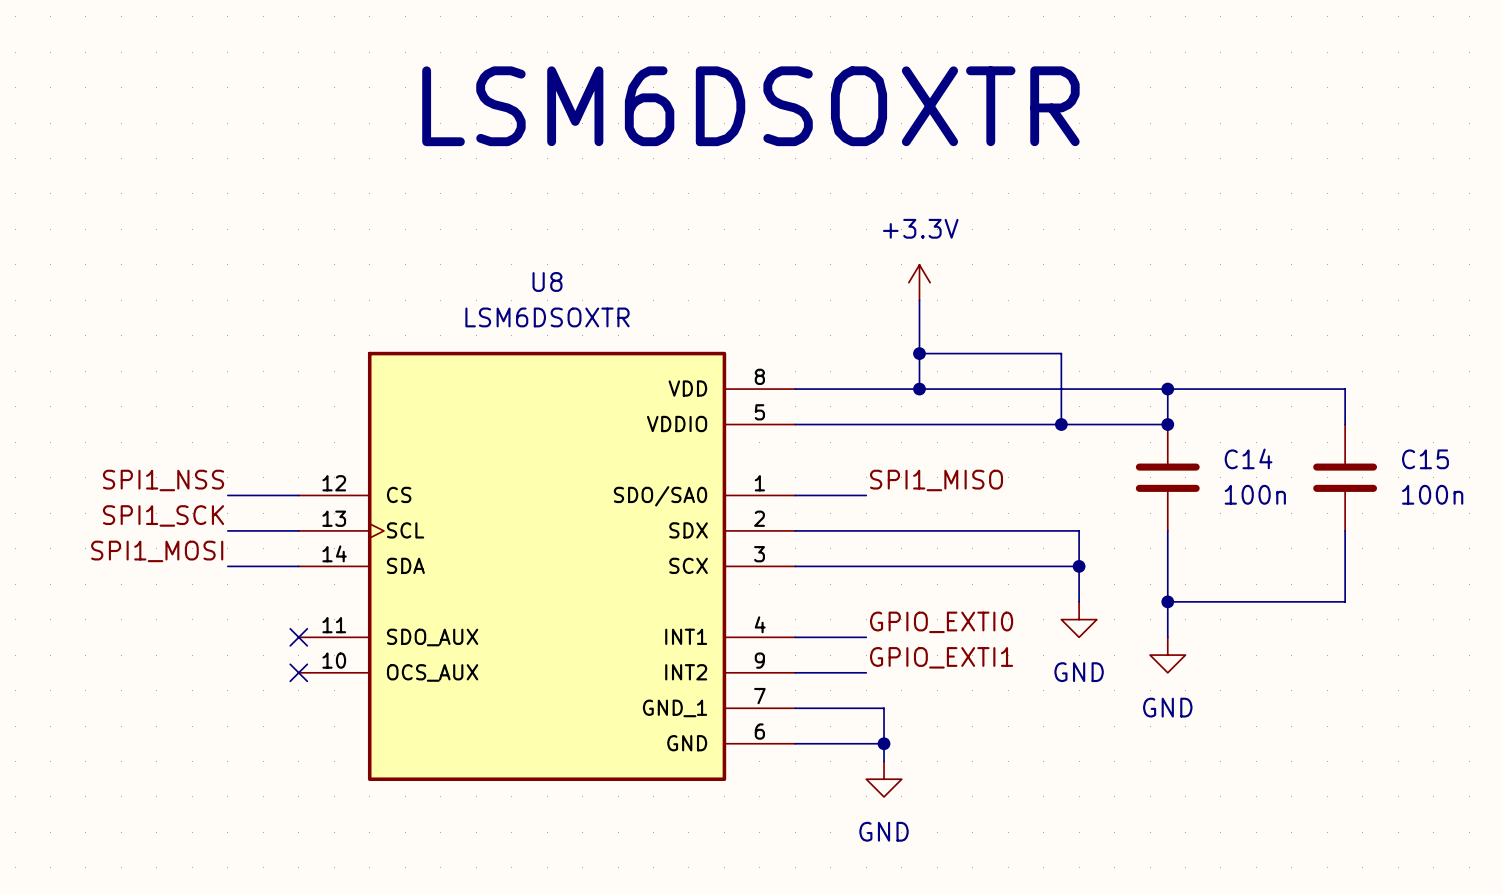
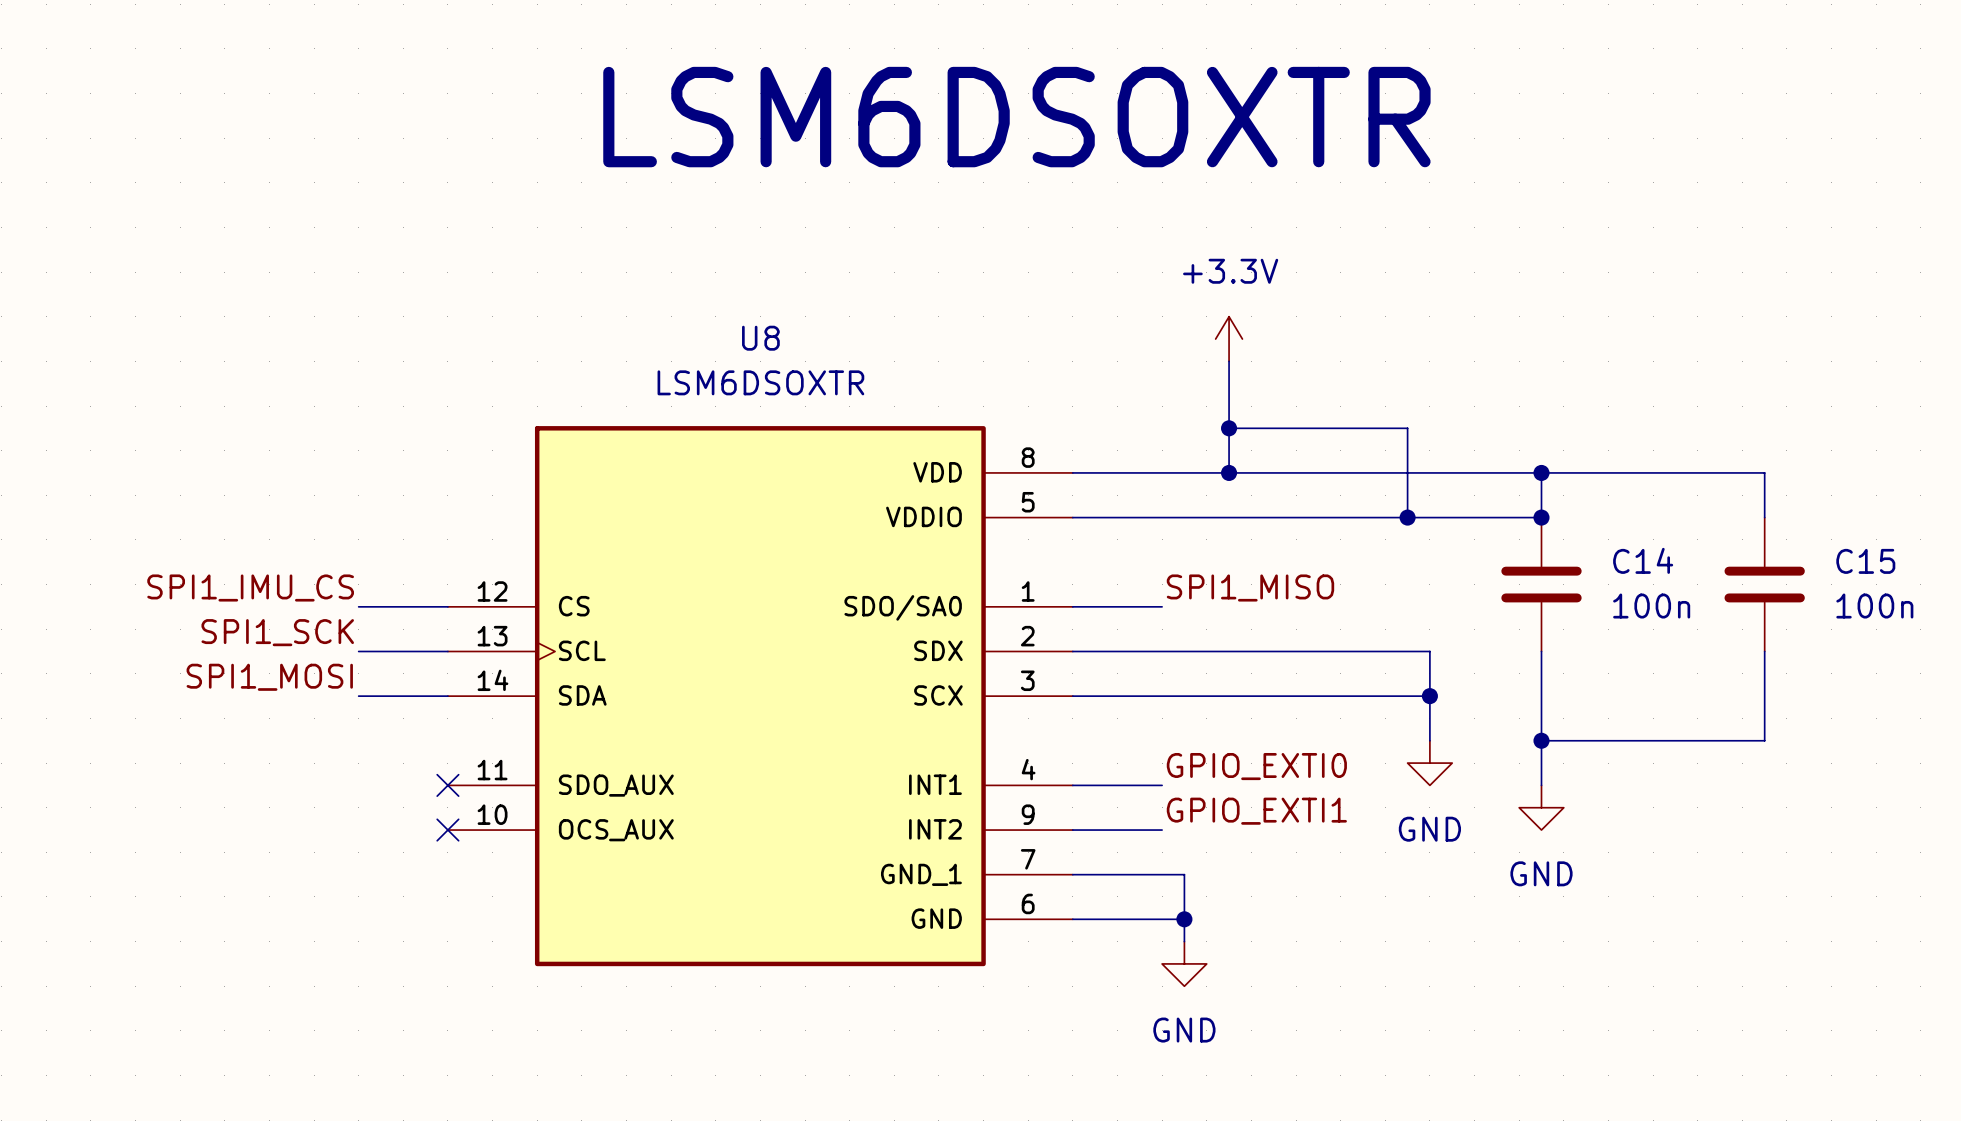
label: SPI1_NSS (163, 480) -> SPI1_IMU_CS (250, 588)

